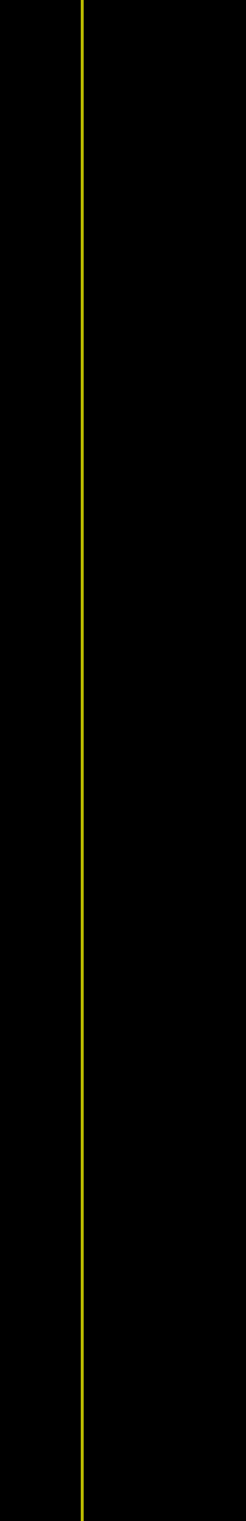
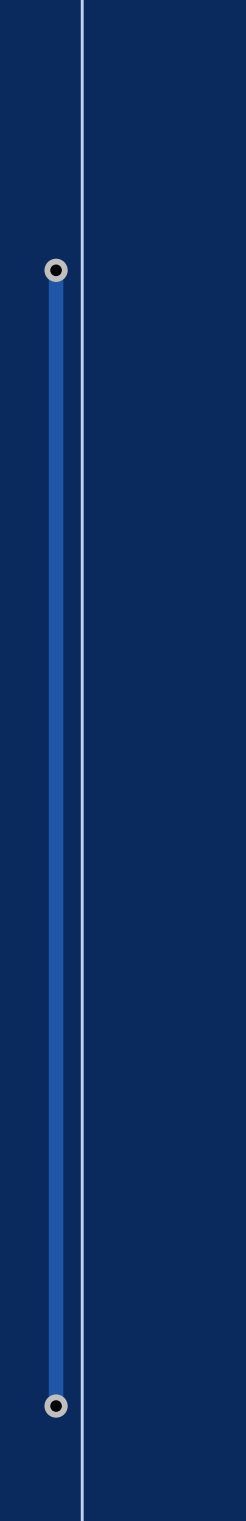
track: none -> (56, 270) (56, 1408)
via: none -> (56, 270)
via: none -> (56, 1406)

